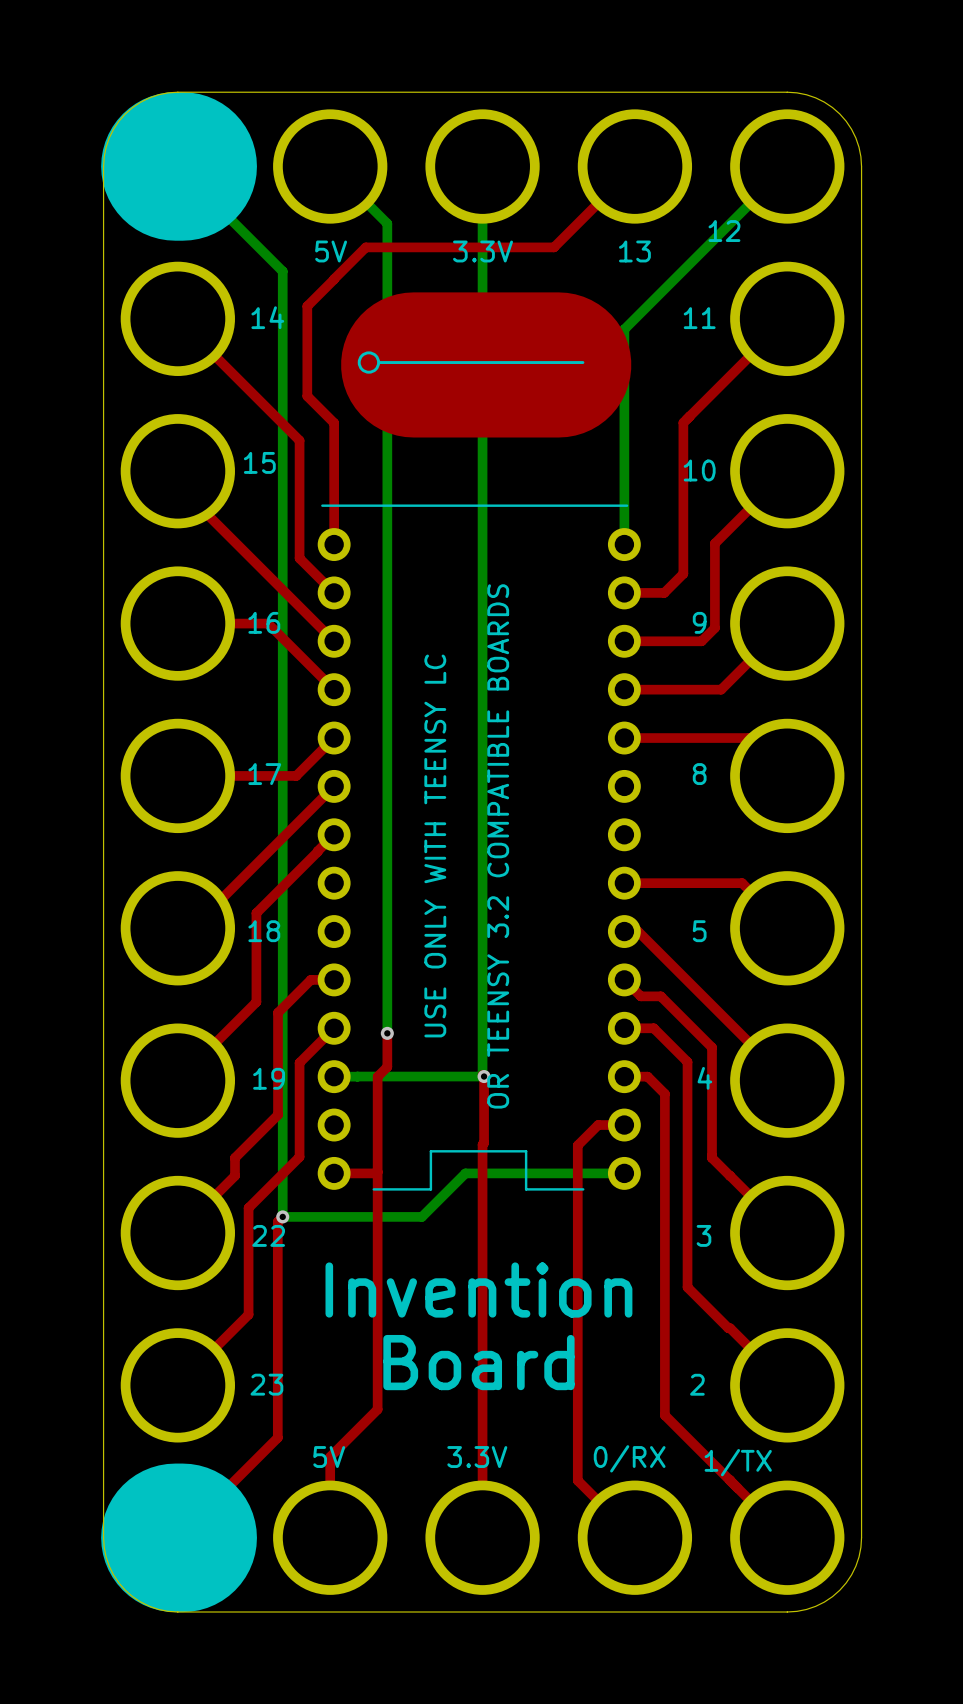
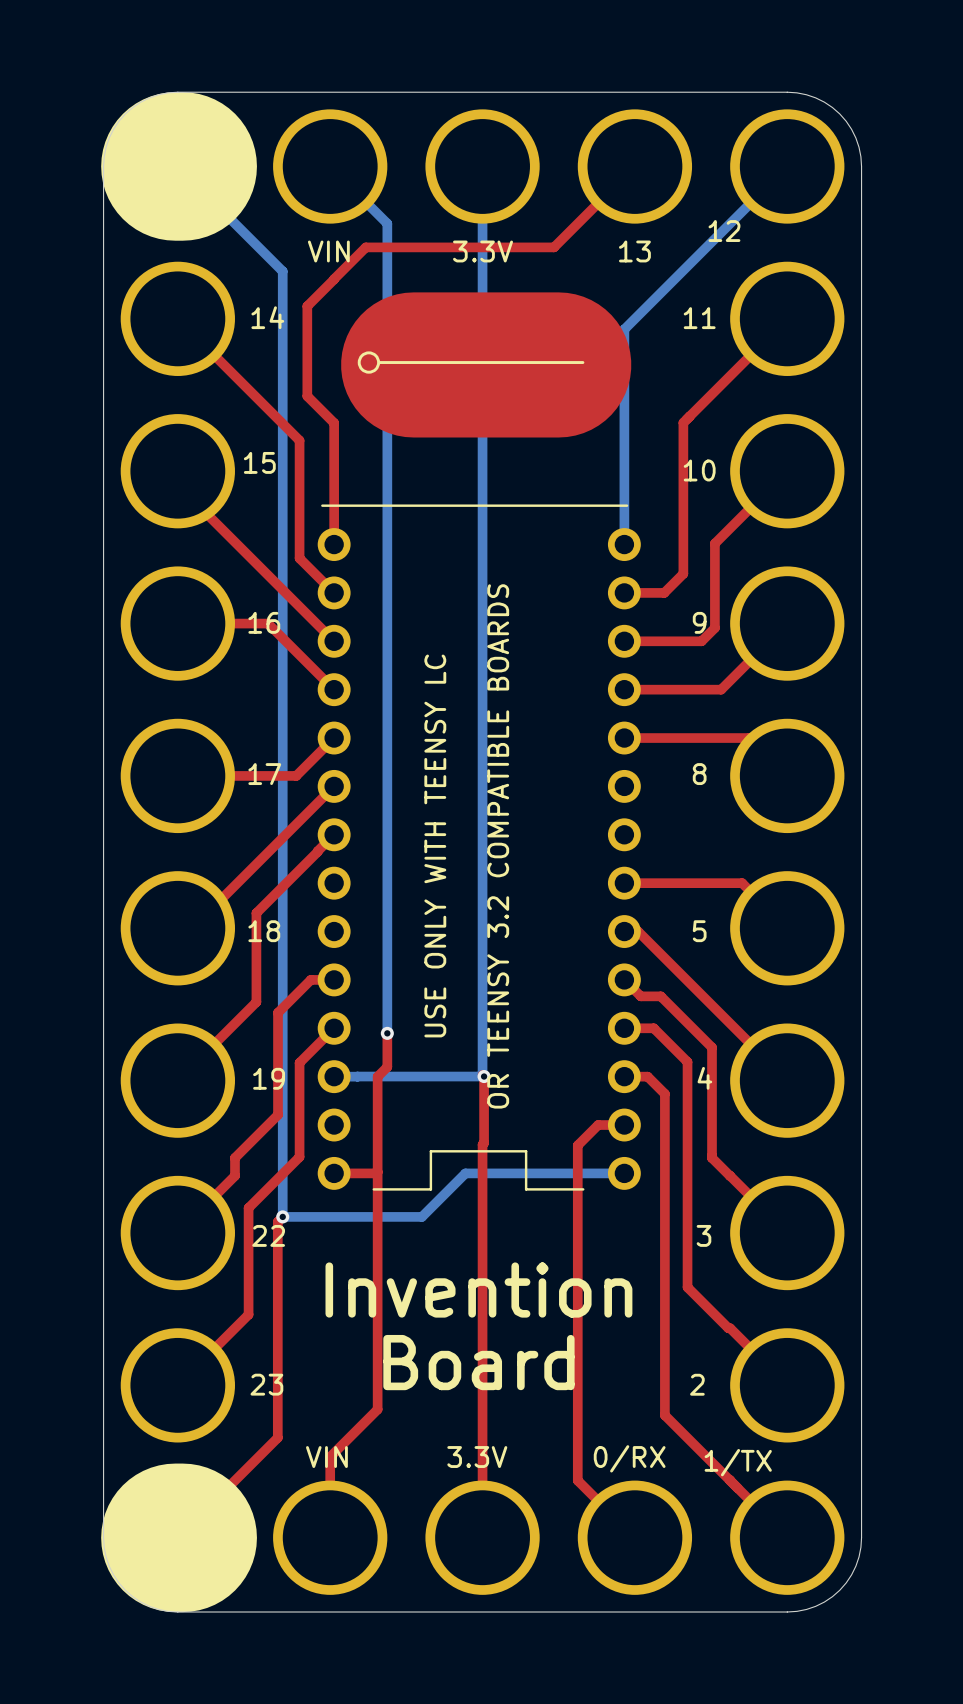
part text: 5V (331, 251) -> VIN (328, 251)
part text: 5V (329, 1457) -> VIN (326, 1457)

